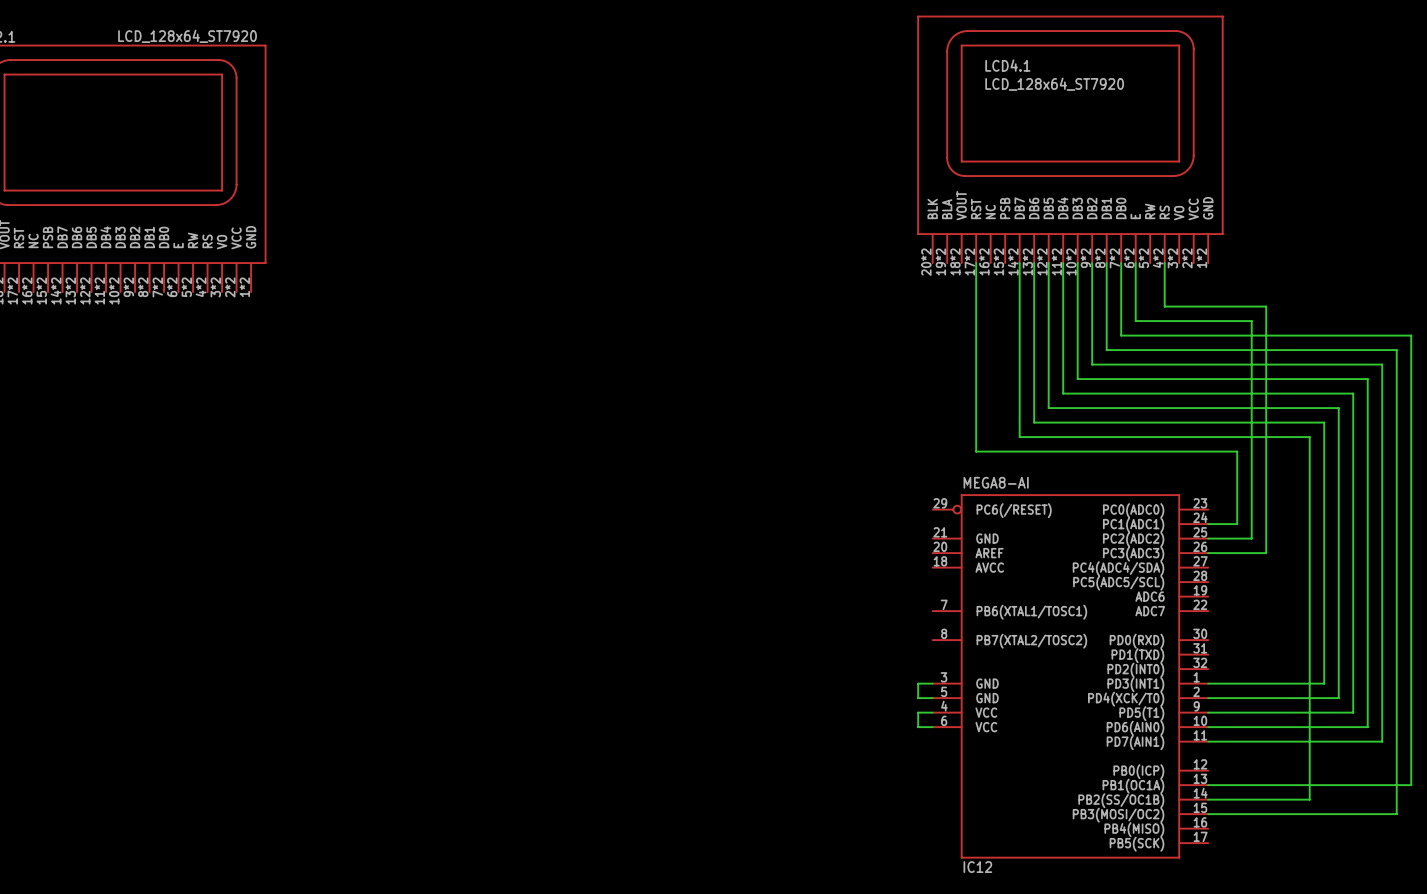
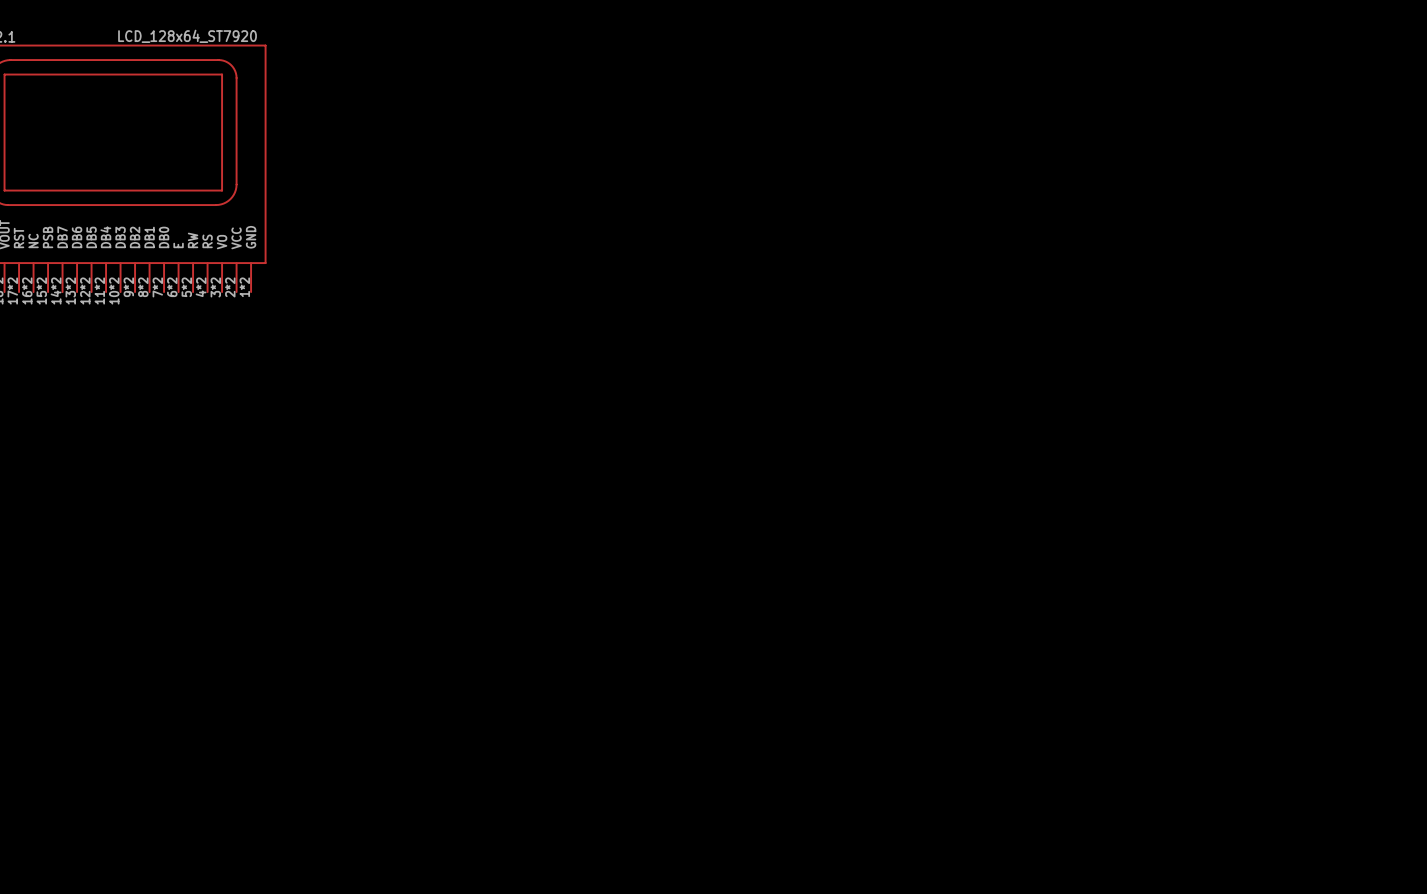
LCD4.1: LCD_128x64_ST7920 (1070, 139) -> none
wire: (976, 263) (976, 451) (1237, 451) (1237, 524) (1208, 524) -> none
wire: (1019, 263) (1019, 437) (1309, 437) (1309, 799) (1208, 799) -> none
wire: (1034, 263) (1034, 422) (1324, 422) (1324, 683) (1208, 683) -> none
wire: (1048, 263) (1048, 408) (1338, 408) (1338, 698) (1208, 698) -> none
wire: (1063, 263) (1063, 393) (1353, 393) (1353, 712) (1208, 712) -> none
wire: (1077, 263) (1077, 379) (1367, 379) (1367, 727) (1208, 727) -> none
wire: (1092, 263) (1092, 364) (1382, 364) (1382, 741) (1208, 741) -> none
wire: (1106, 263) (1106, 350) (1396, 350) (1396, 814) (1208, 814) -> none
wire: (1121, 263) (1121, 335) (1411, 335) (1411, 785) (1208, 785) -> none
wire: (1135, 263) (1135, 321) (1251, 321) (1251, 538) (1208, 538) -> none
wire: (1164, 263) (1164, 306) (1266, 306) (1266, 553) (1208, 553) -> none
IC12: MEGA8-AI (1070, 676) -> none
wire: (932, 683) (918, 683) (918, 698) (932, 698) -> none
wire: (932, 712) (918, 712) (918, 727) (932, 727) -> none

